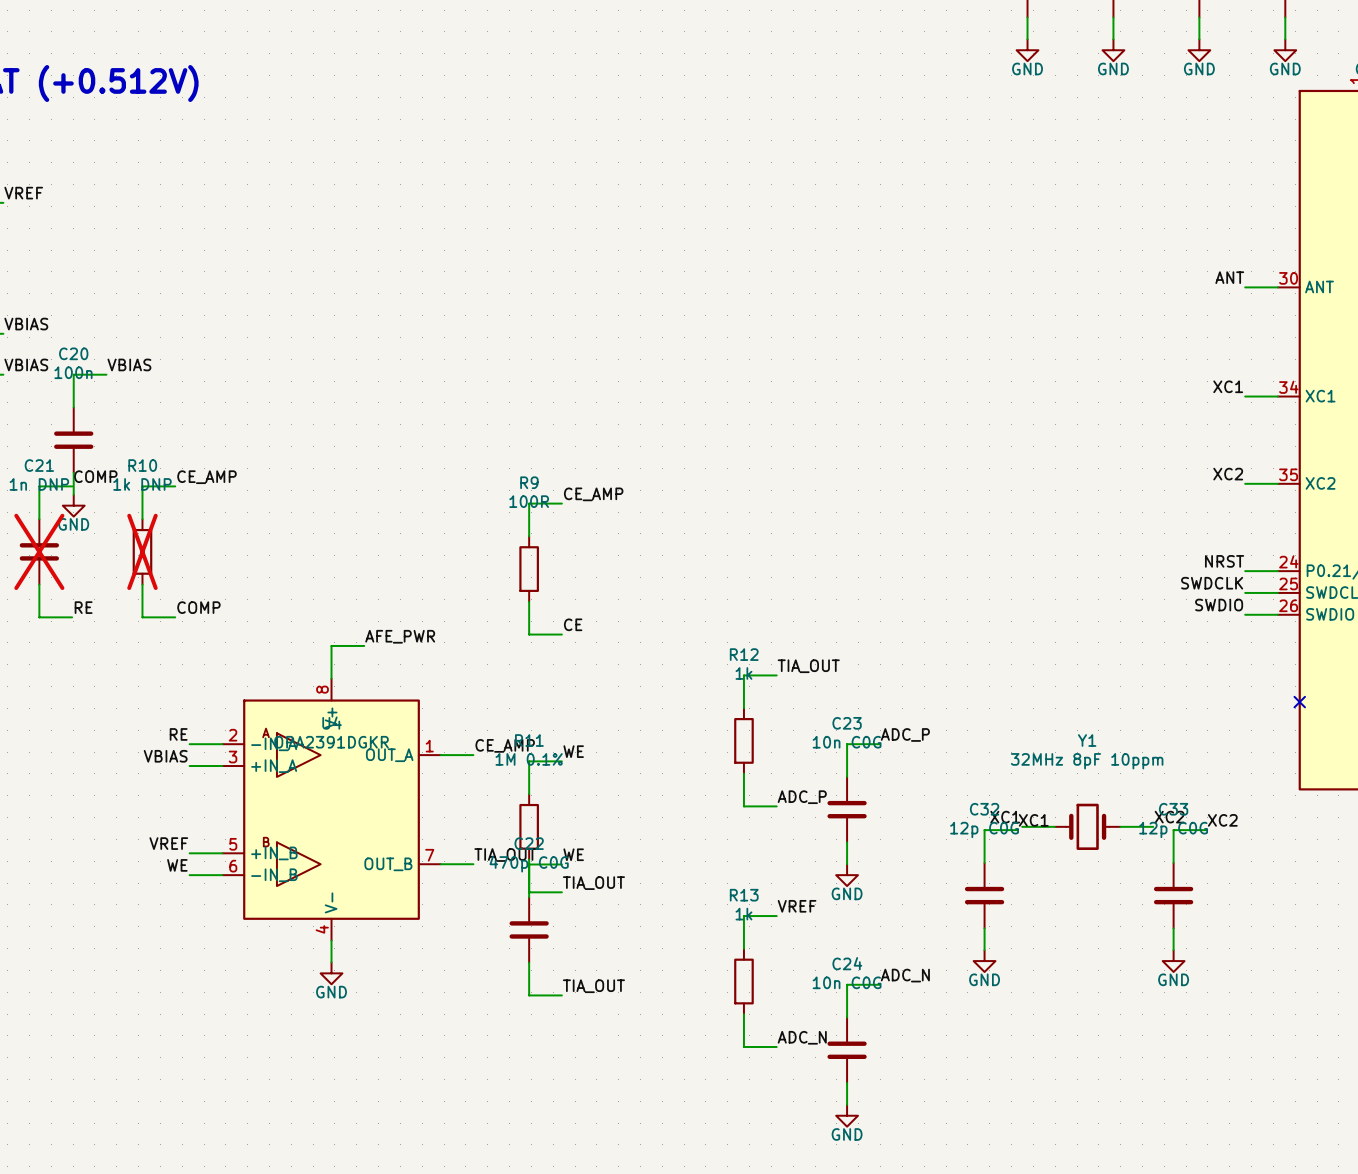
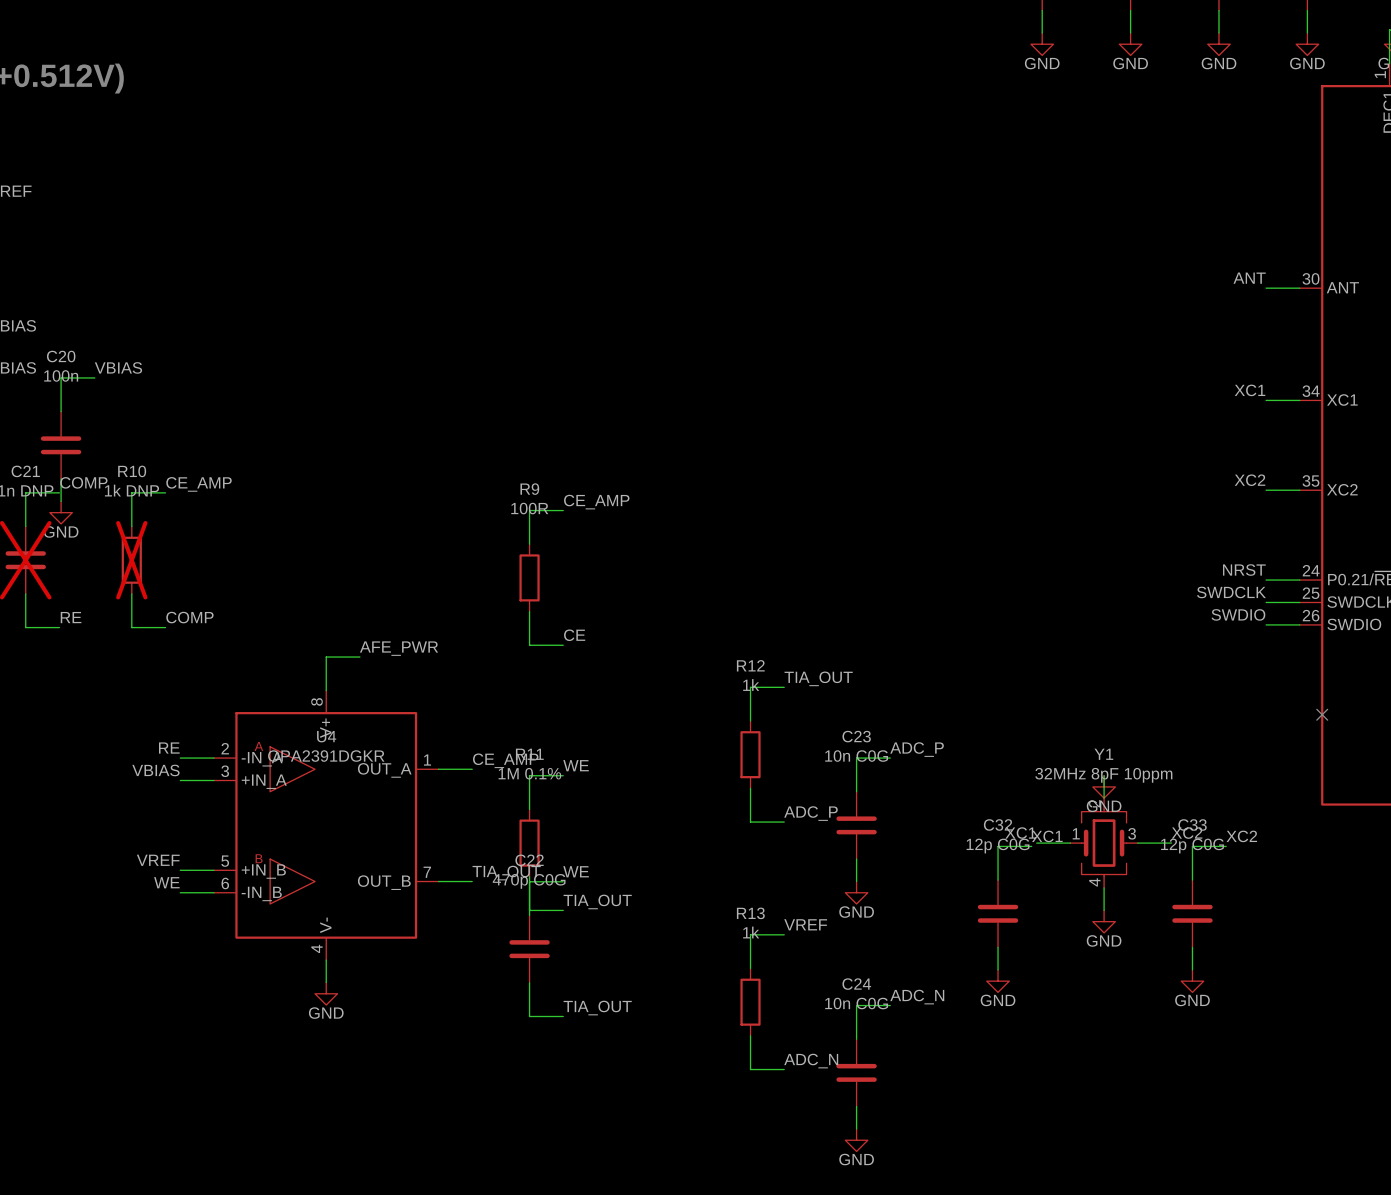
wire: none -> (1104, 775) (1104, 798)
power symbol: none -> GND (1104, 786)
Y1 symbol: [1054, 803, 1121, 850] -> [1070, 798, 1138, 888]
wire: none -> (1104, 887) (1104, 910)
power symbol: none -> GND (1104, 921)

